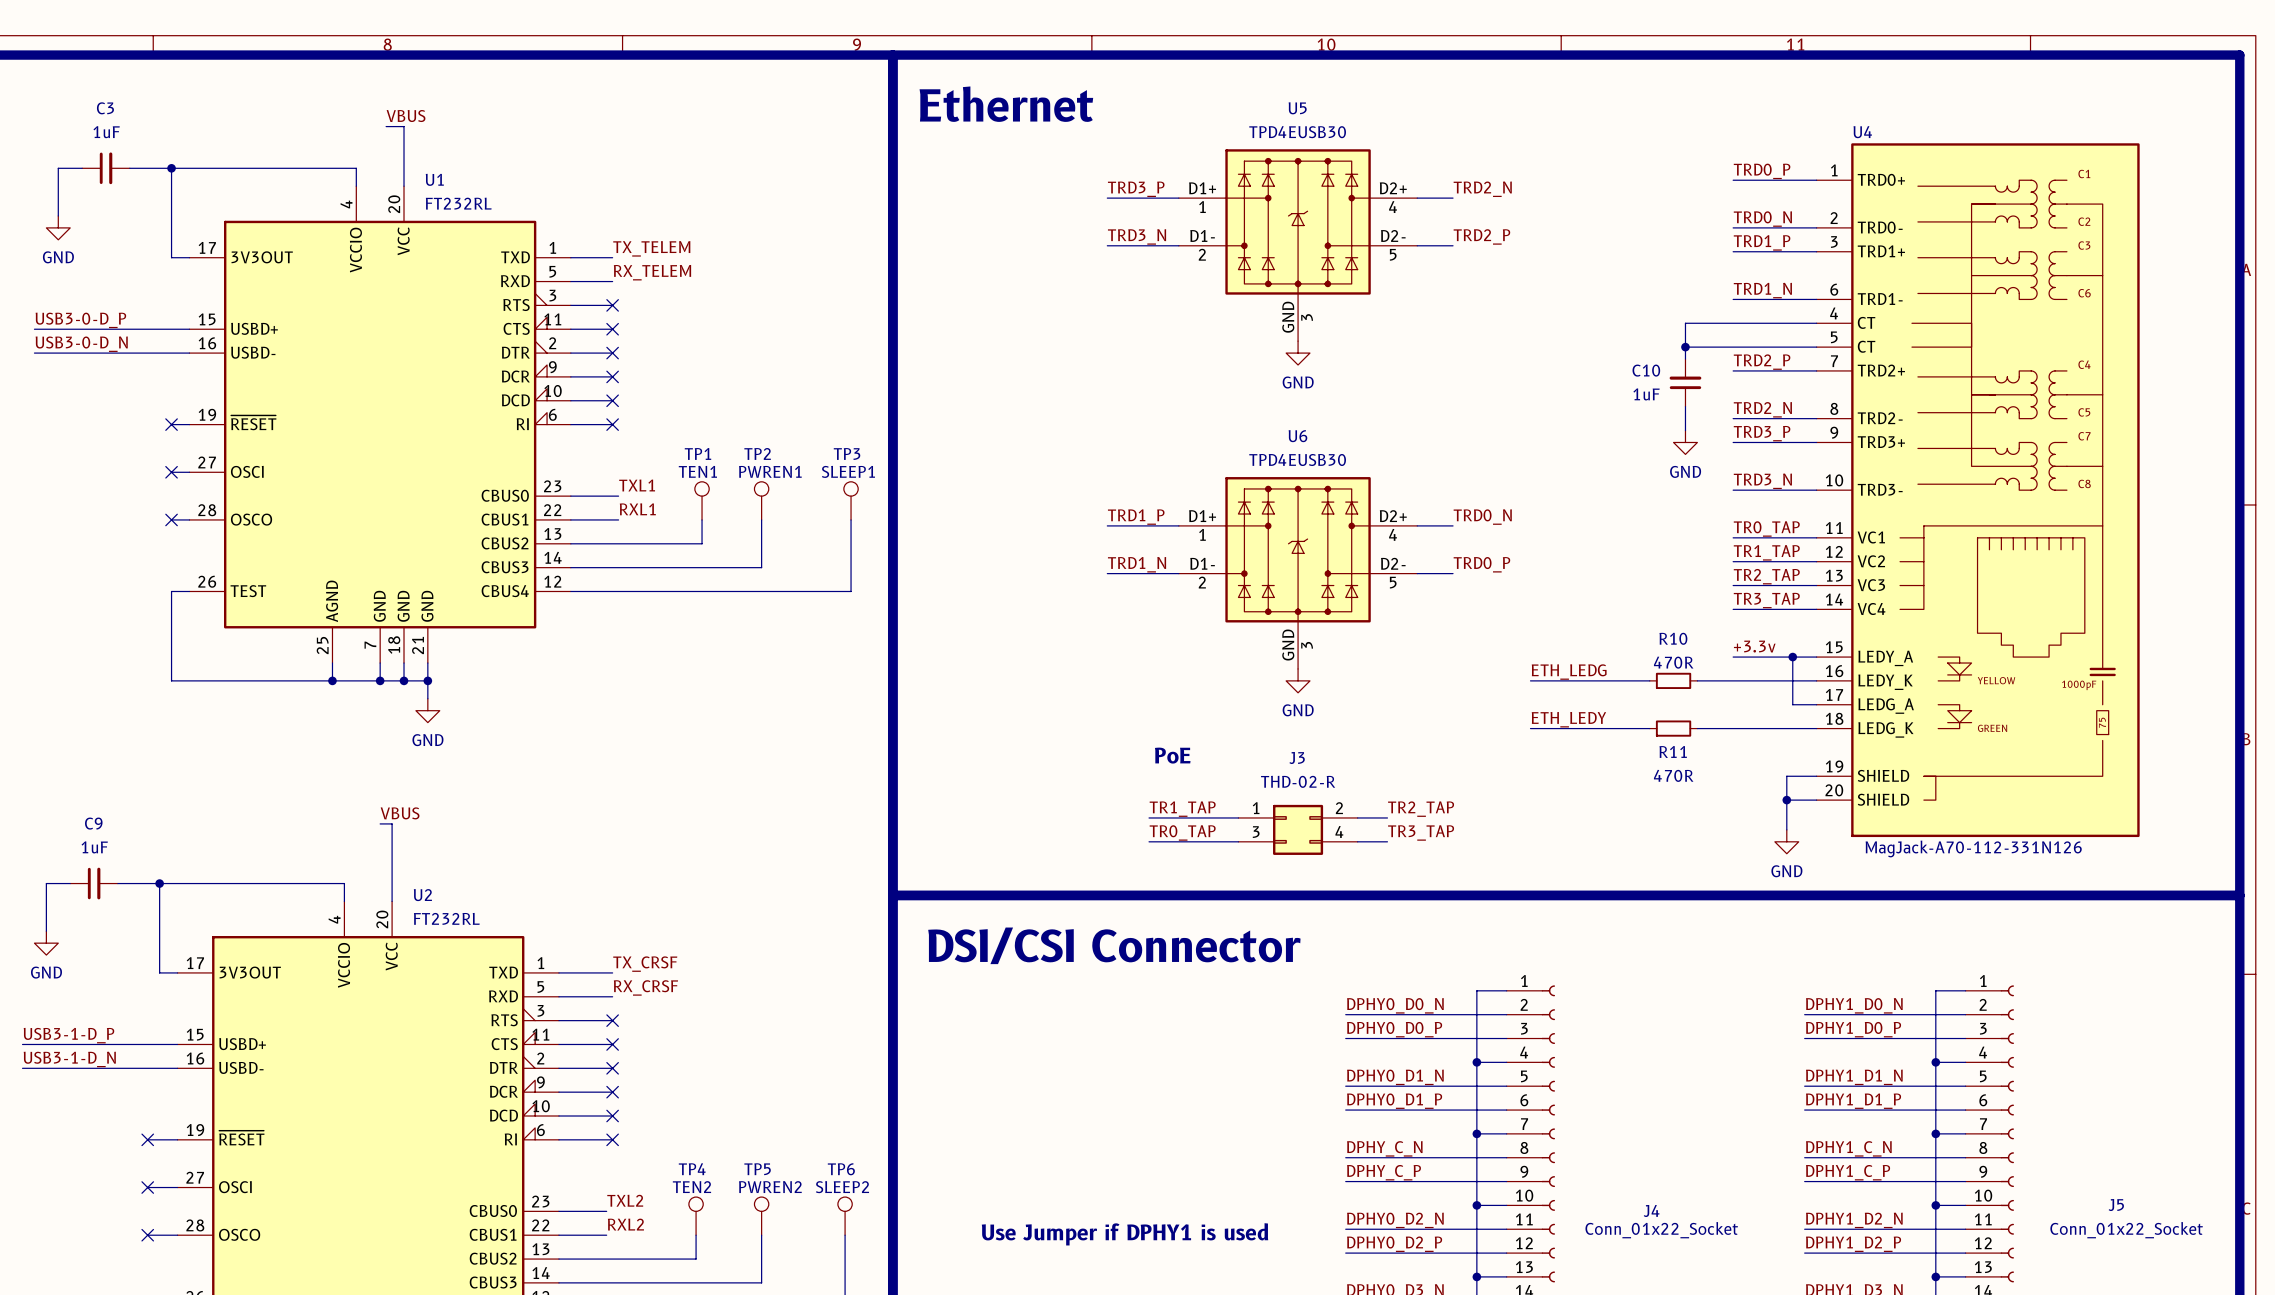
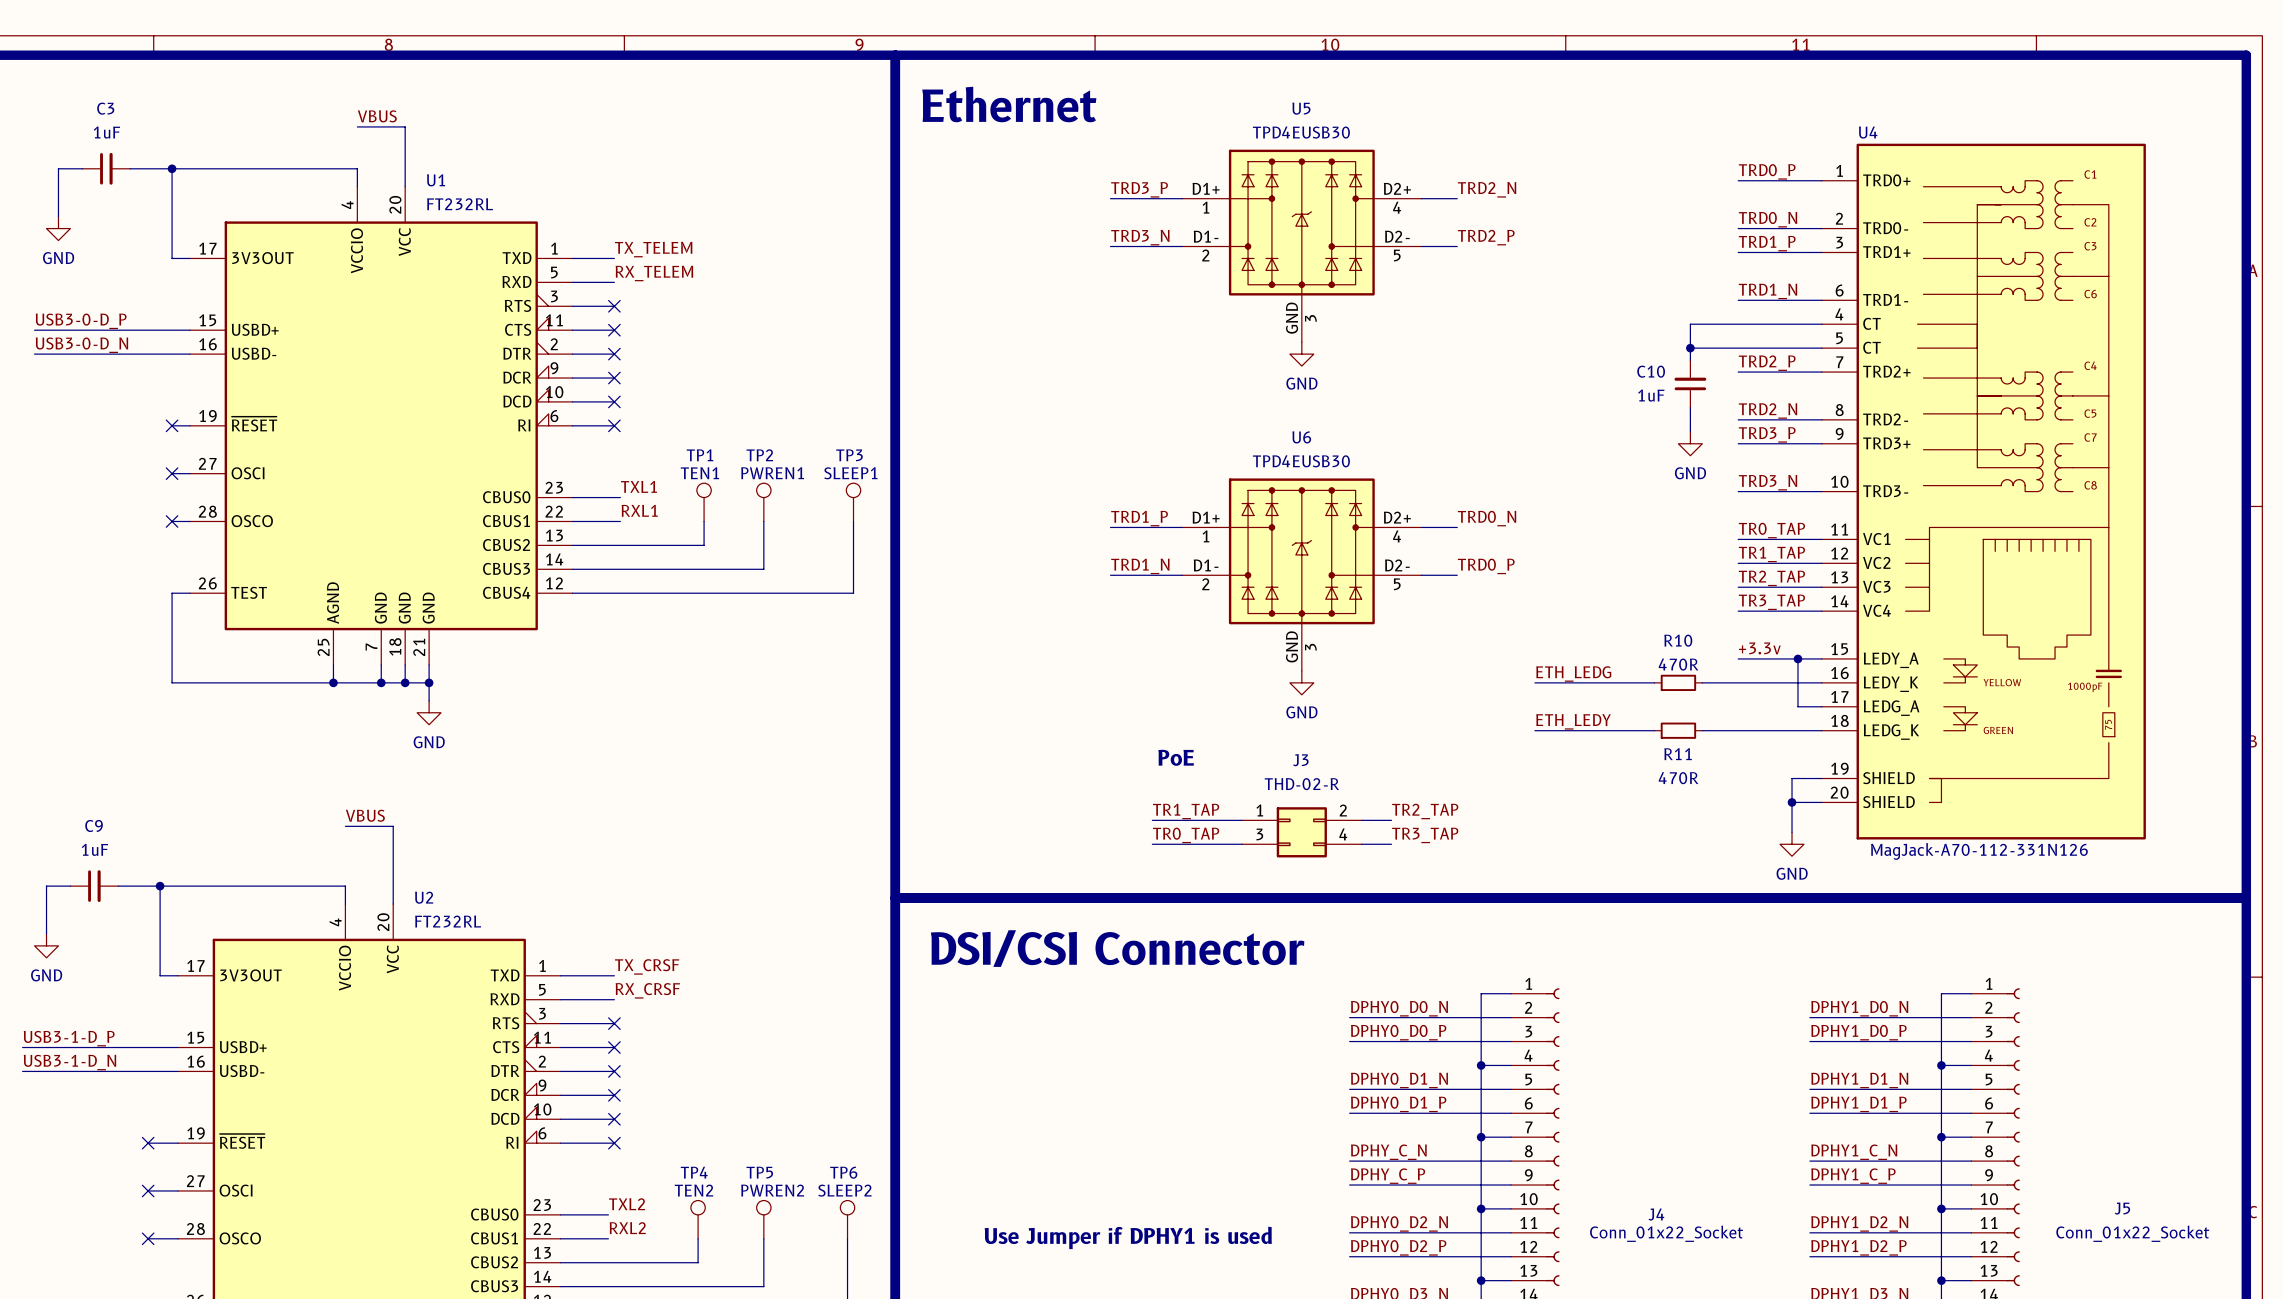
label position: VBUS (406, 116) -> VBUS (377, 116)
wire: none -> (357, 126) (387, 126)
label position: VBUS (400, 813) -> VBUS (365, 815)
wire: none -> (345, 826) (381, 826)

